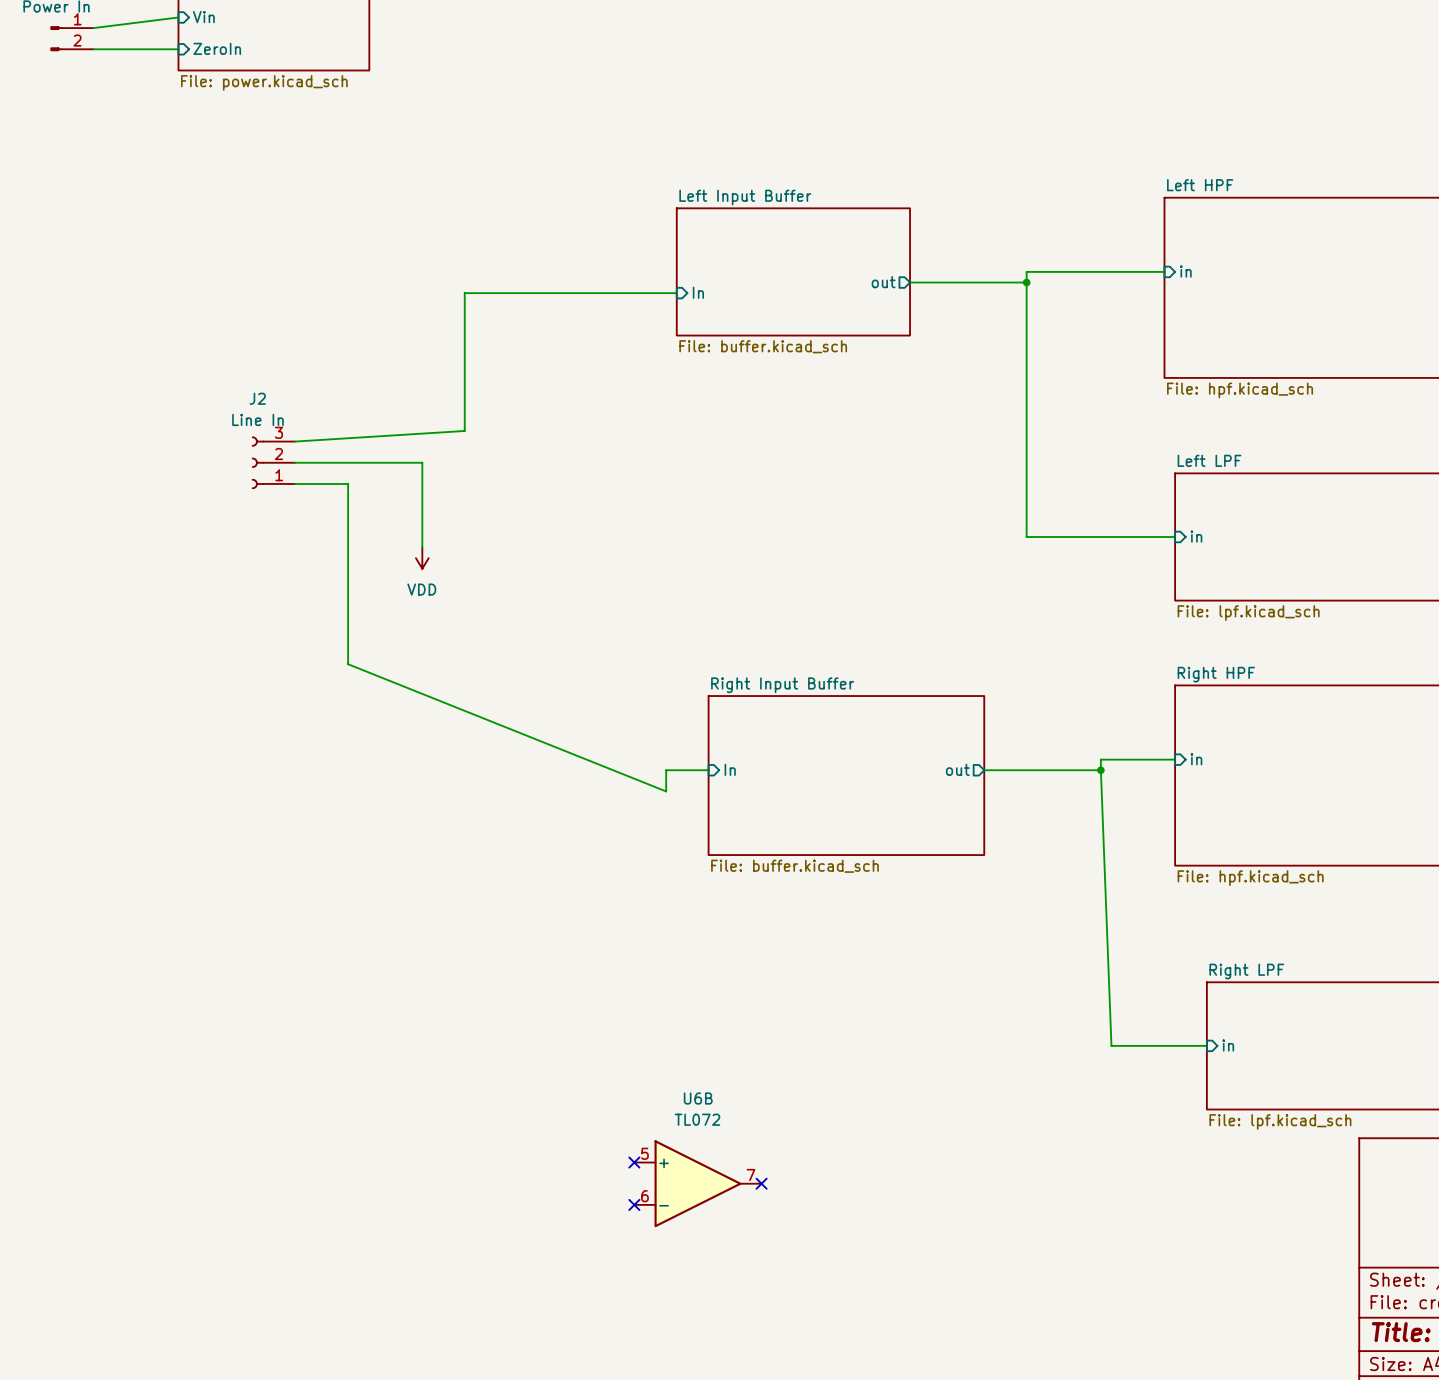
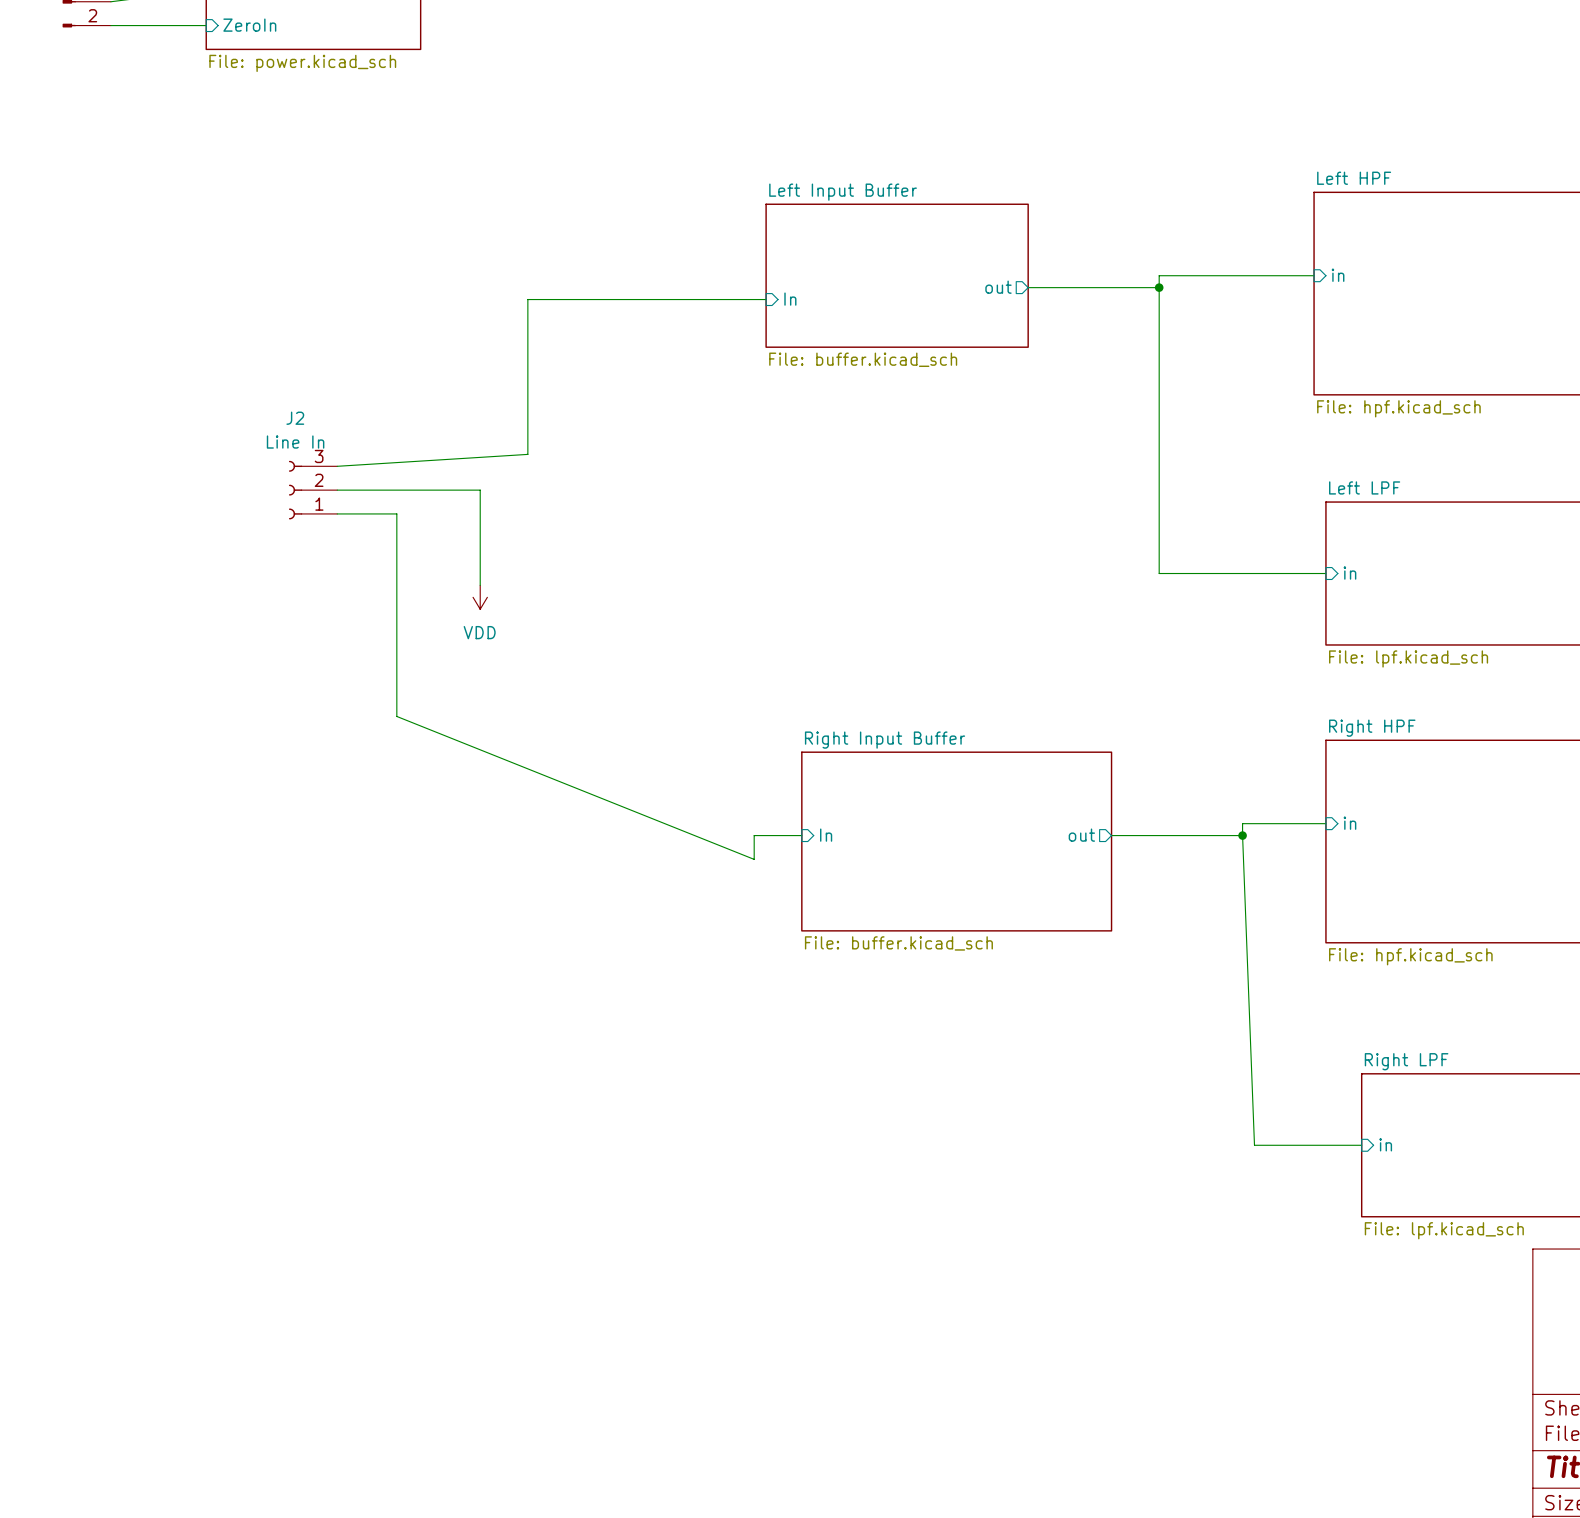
no-connect mark: (634, 1162) -> none
U6B: TL072 (697, 1183) -> none
no-connect mark: (761, 1183) -> none
no-connect mark: (634, 1204) -> none

